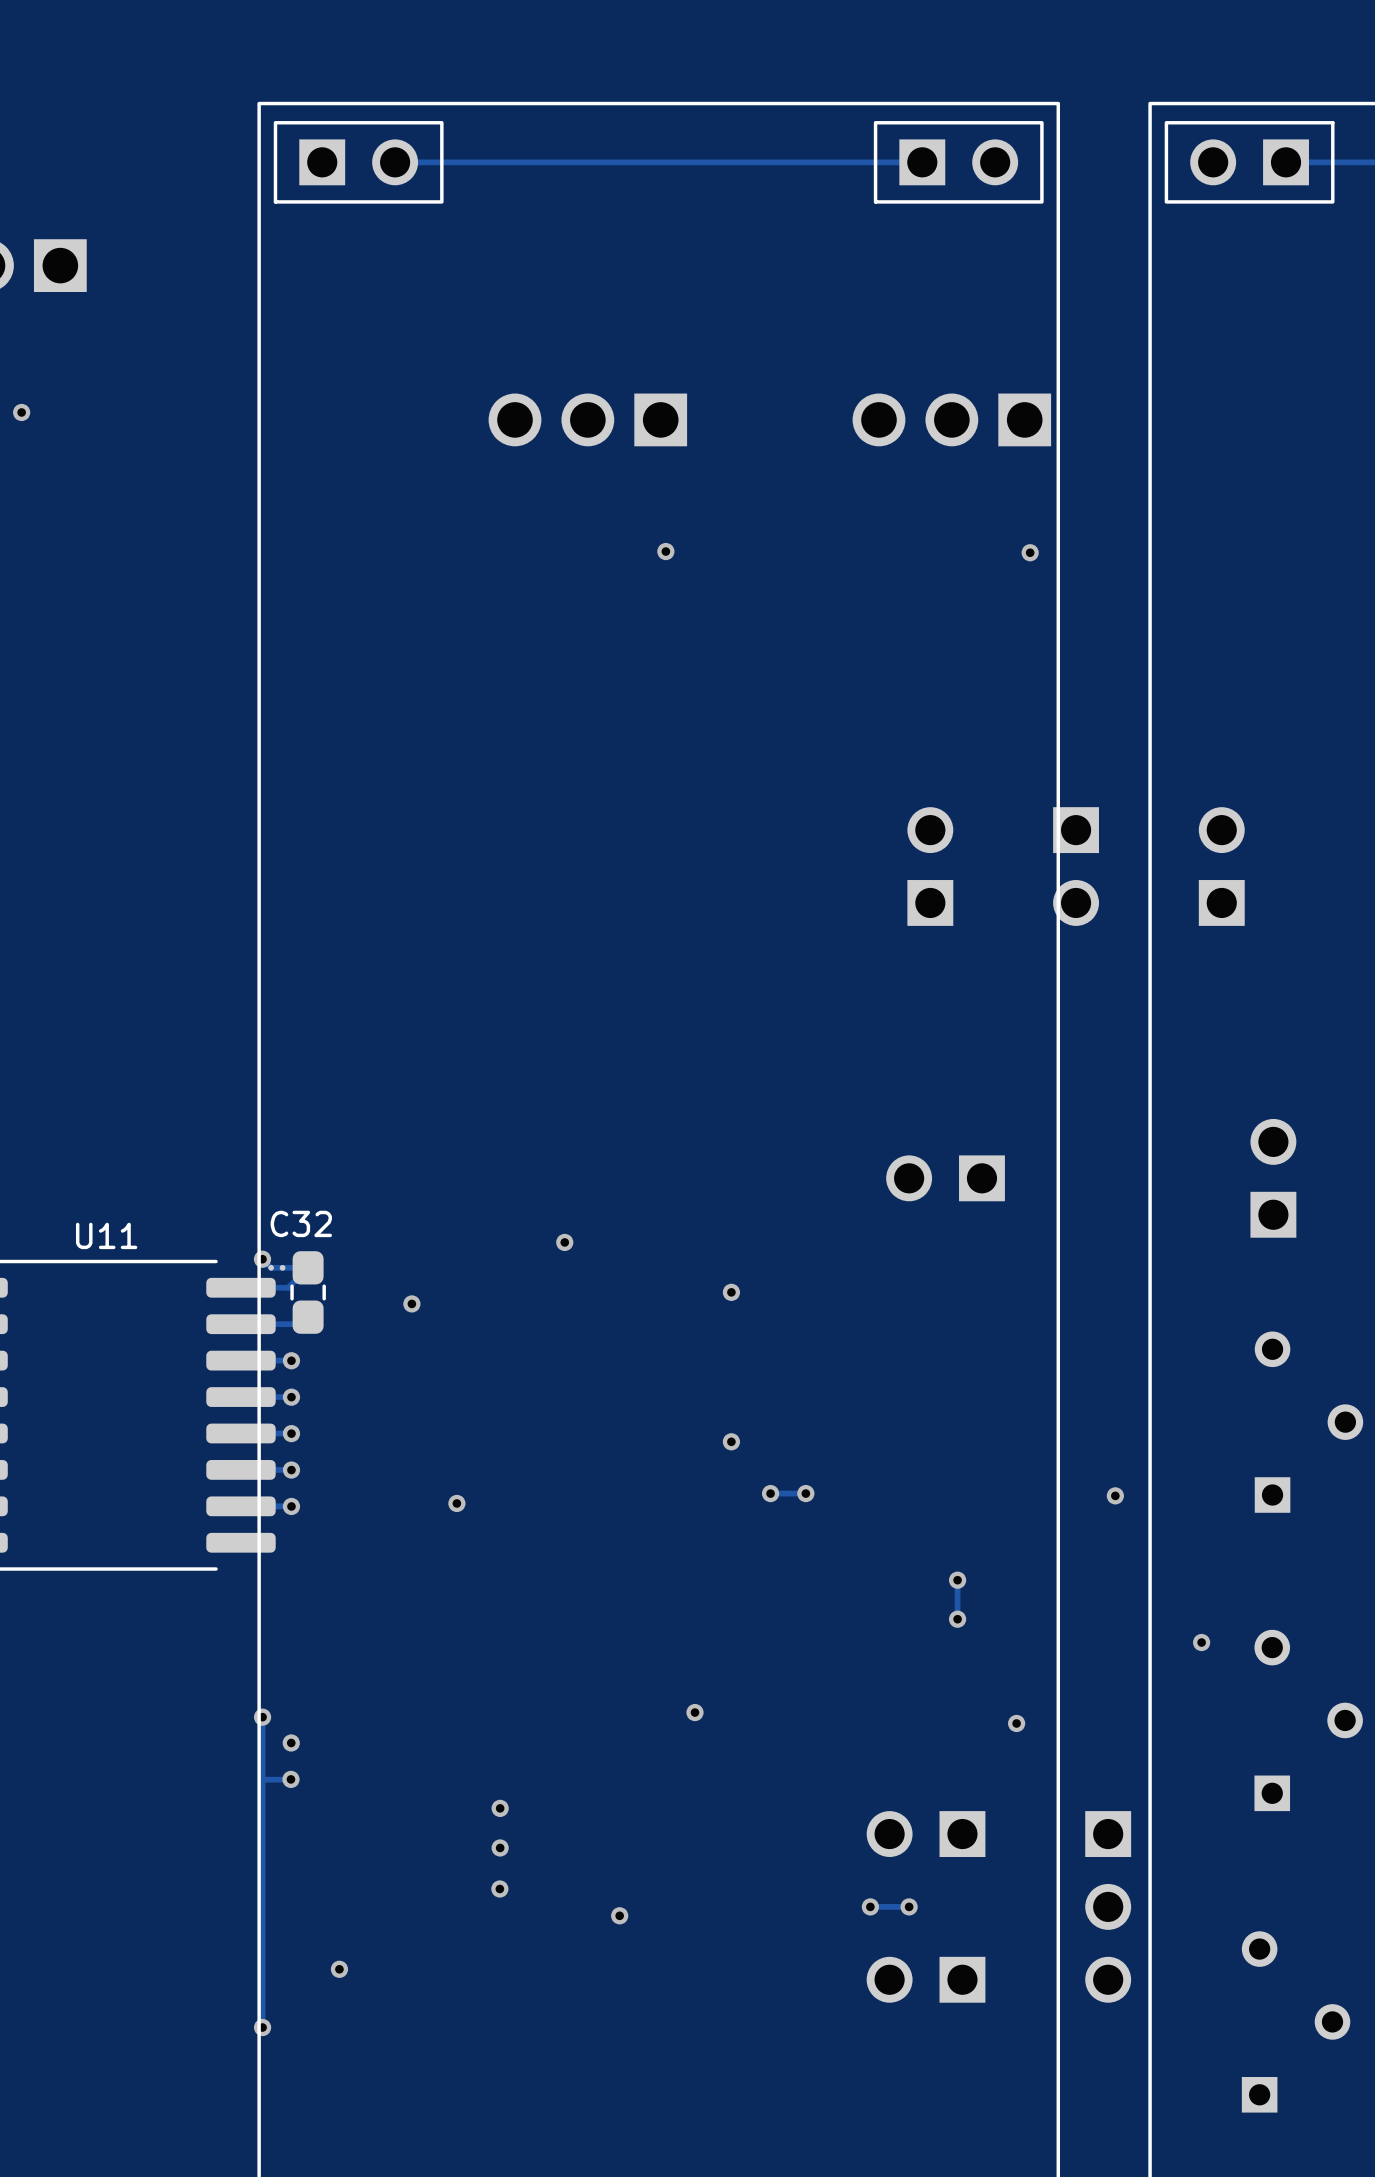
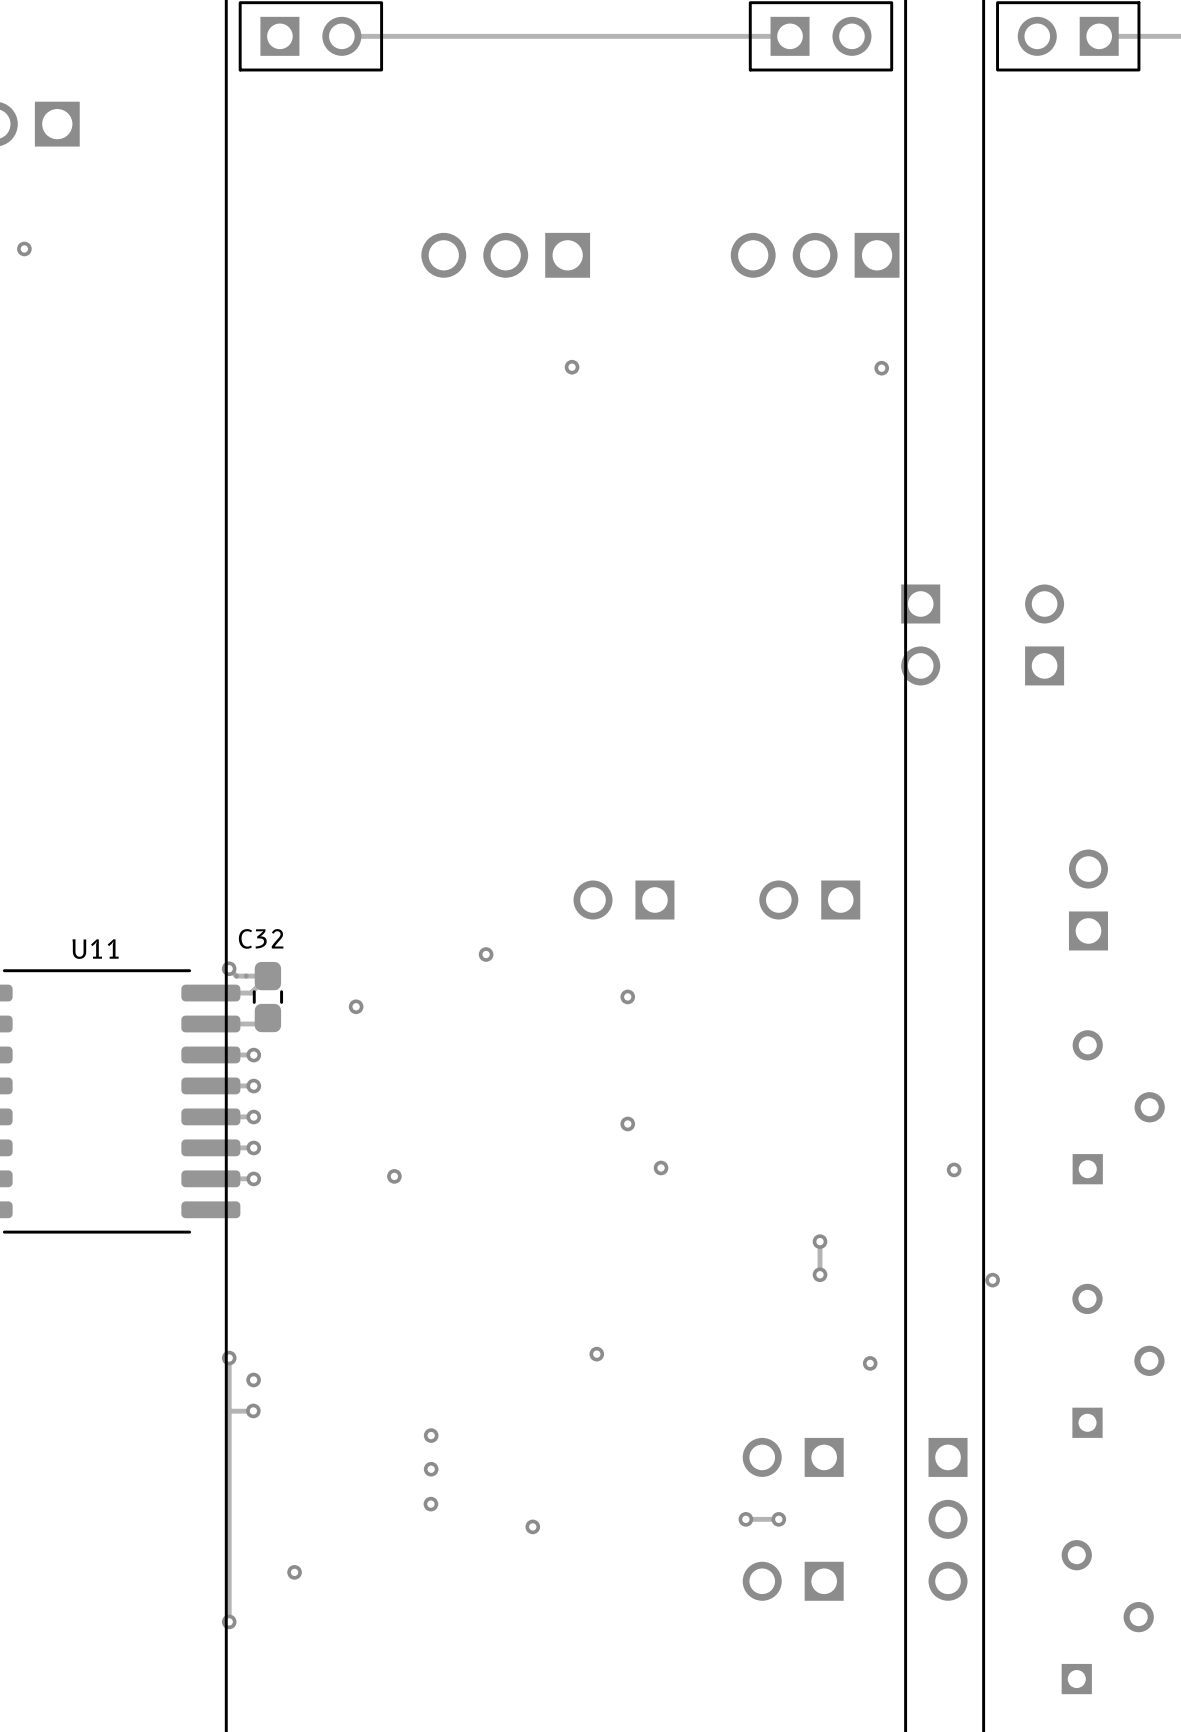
part rotation: 0° (930, 866) -> 90° counterclockwise (623, 900)
part position: (930, 866) -> (623, 900)
track: (805, 1493) (770, 1493) -> none
via: (805, 1493) -> none
via position: (1201, 1642) -> (992, 1280)

